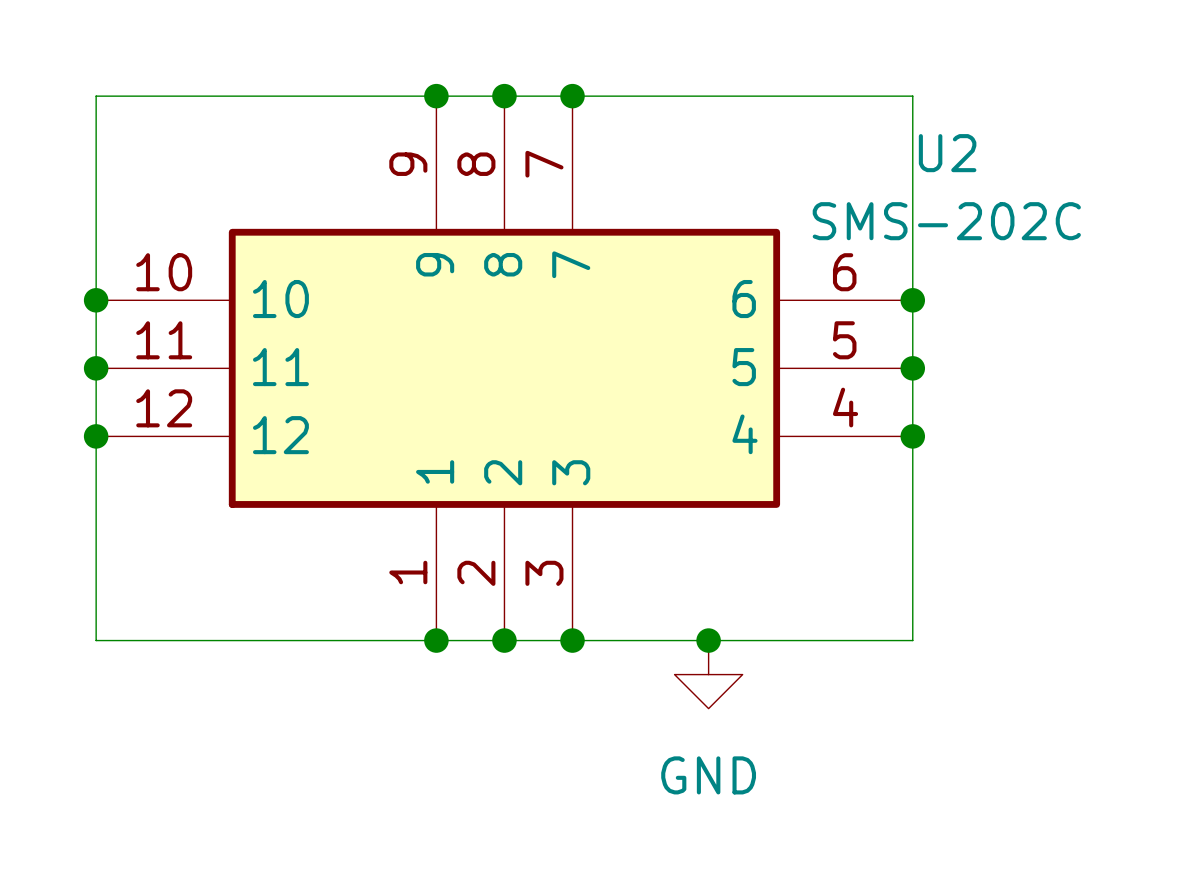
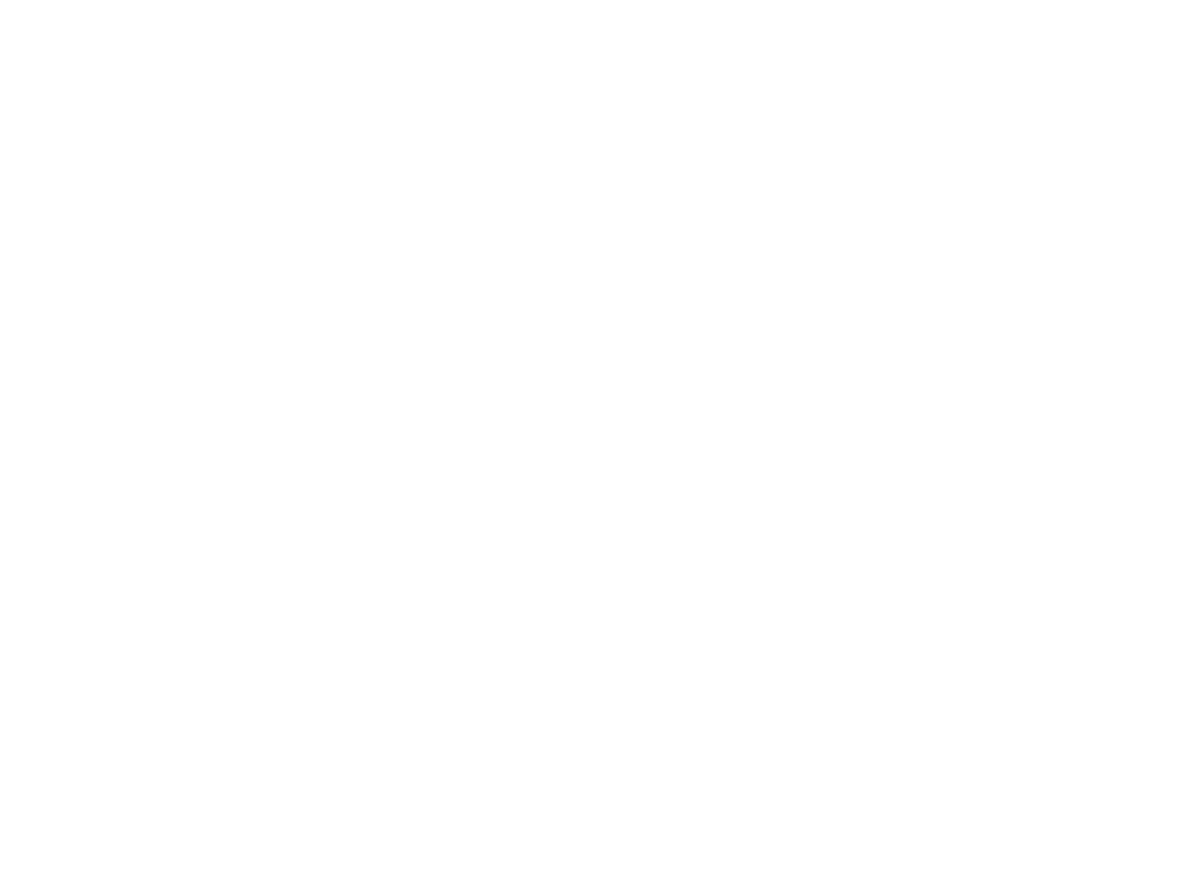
wire: (96, 96) (912, 96) (912, 640) (96, 640) (96, 96) -> none
junction: (436, 96) -> none
junction: (504, 96) -> none
junction: (572, 96) -> none
junction: (96, 300) -> none
junction: (912, 300) -> none
junction: (96, 368) -> none
U2: SMS-202C (504, 368) -> none
junction: (912, 368) -> none
junction: (96, 436) -> none
junction: (912, 436) -> none
junction: (436, 640) -> none
junction: (504, 640) -> none
junction: (572, 640) -> none
junction: (708, 640) -> none
power symbol: GND (708, 674) -> none

